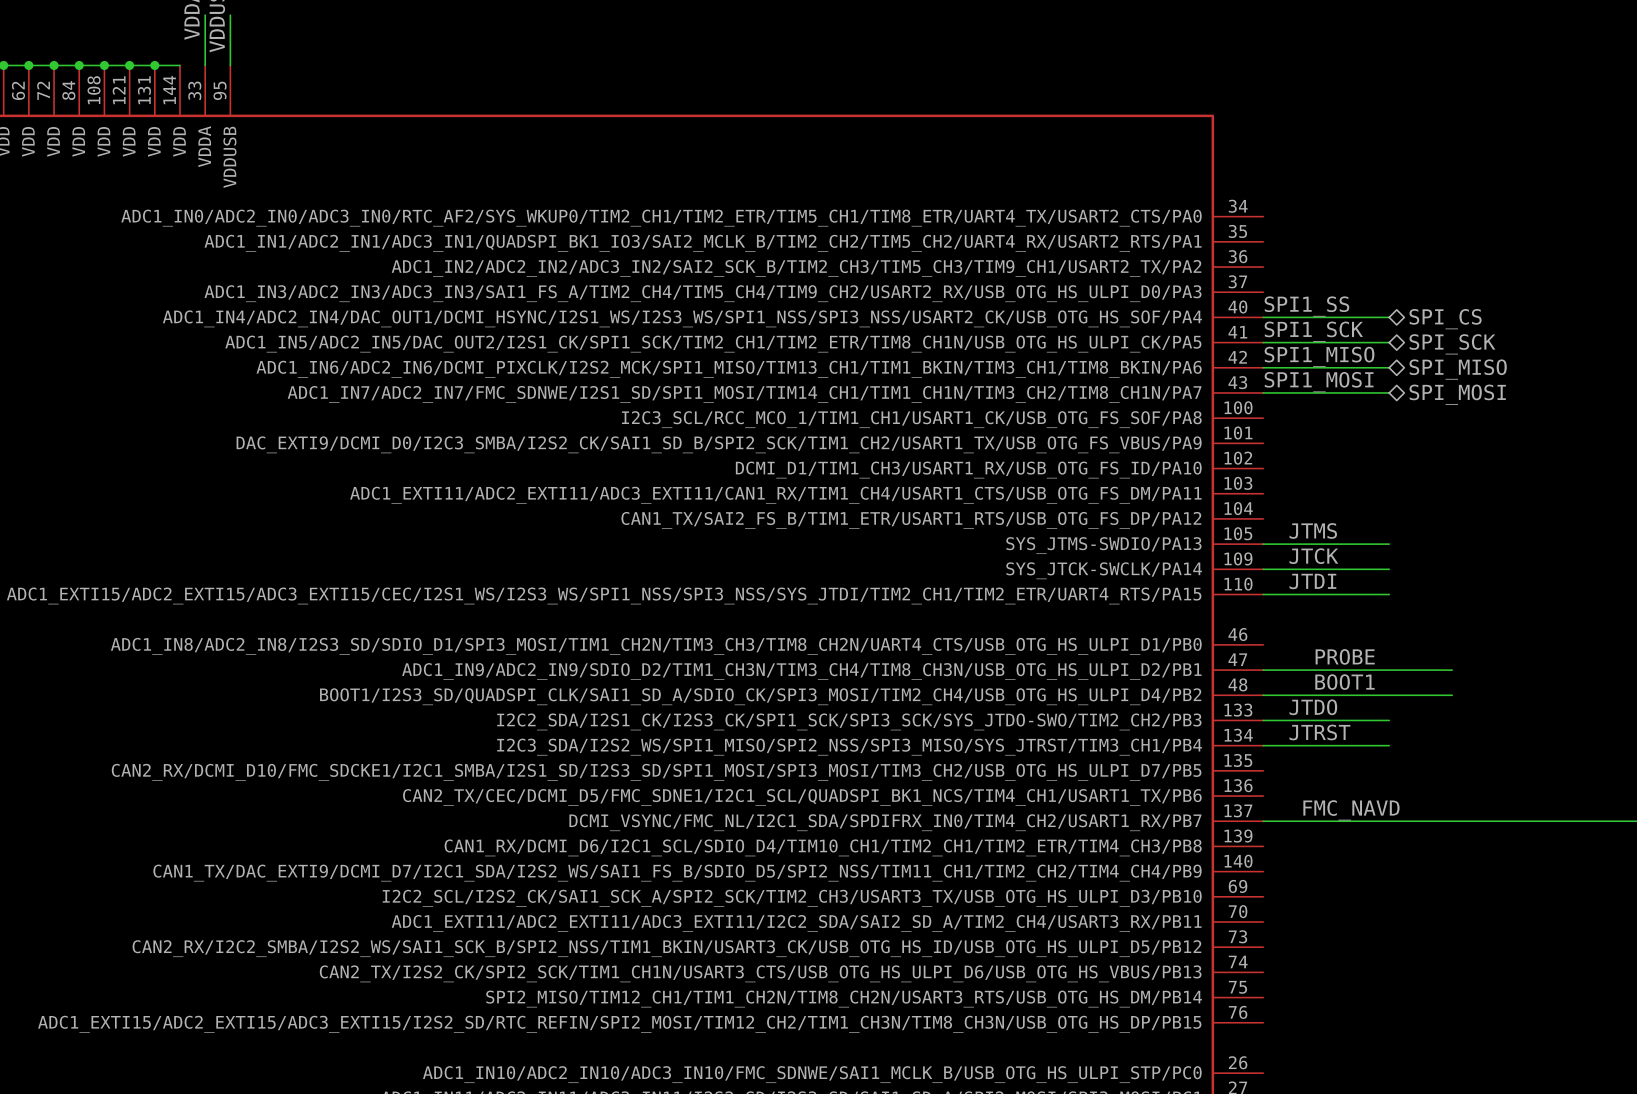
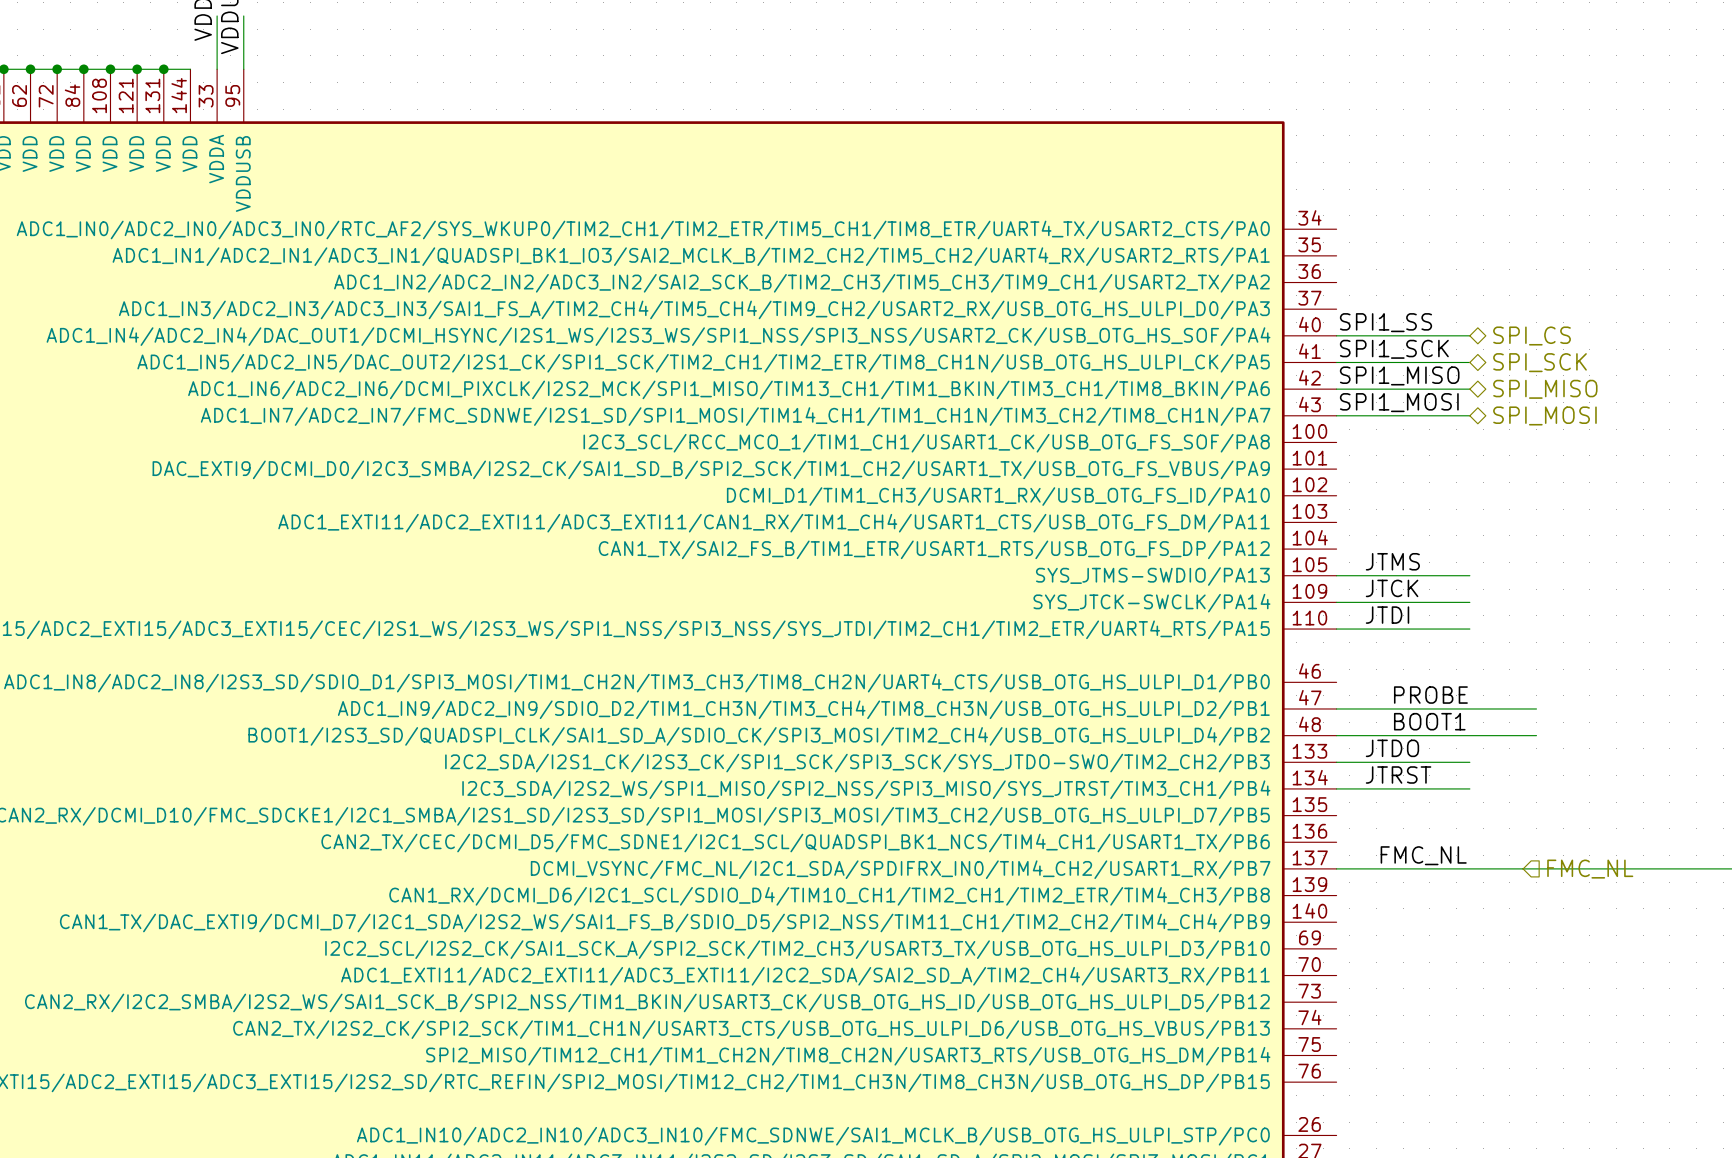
label: FMC_NAVD (1351, 810) -> FMC_NL (1423, 855)
hierarchical label: none -> FMC_NL (1590, 869)

